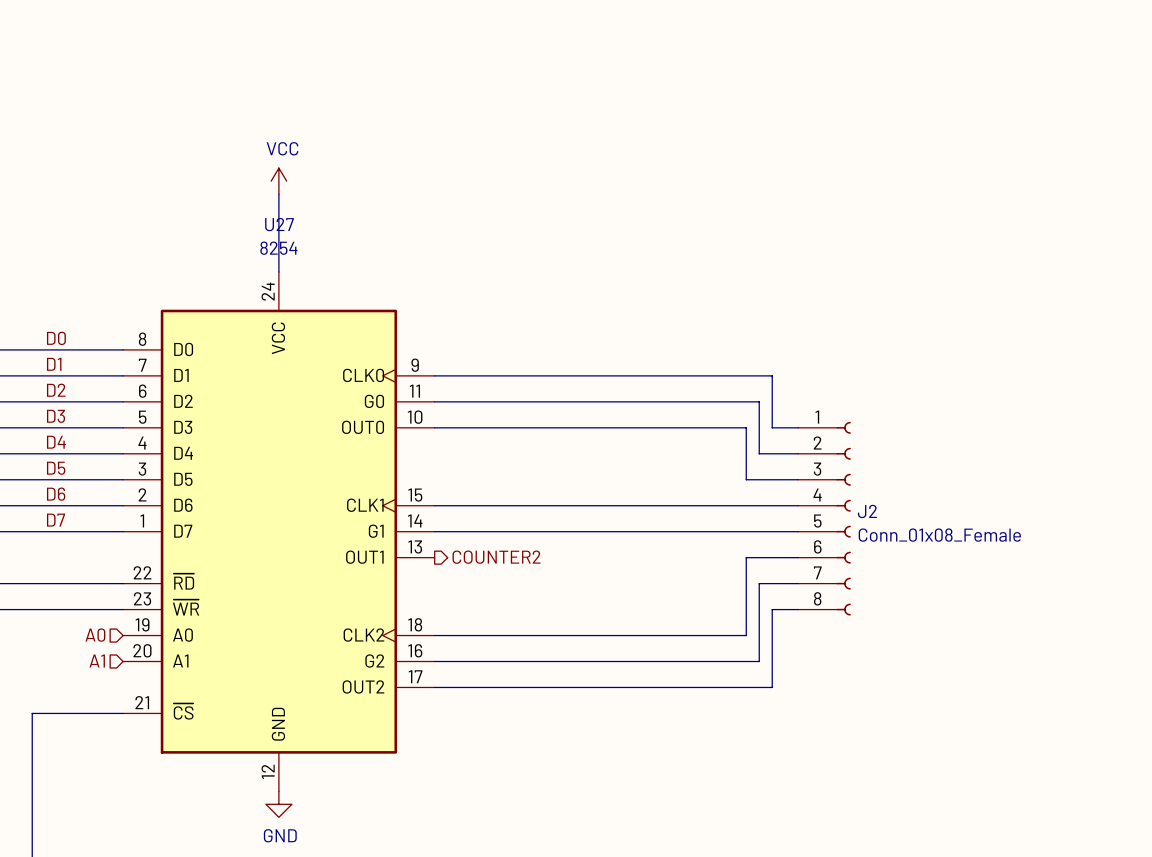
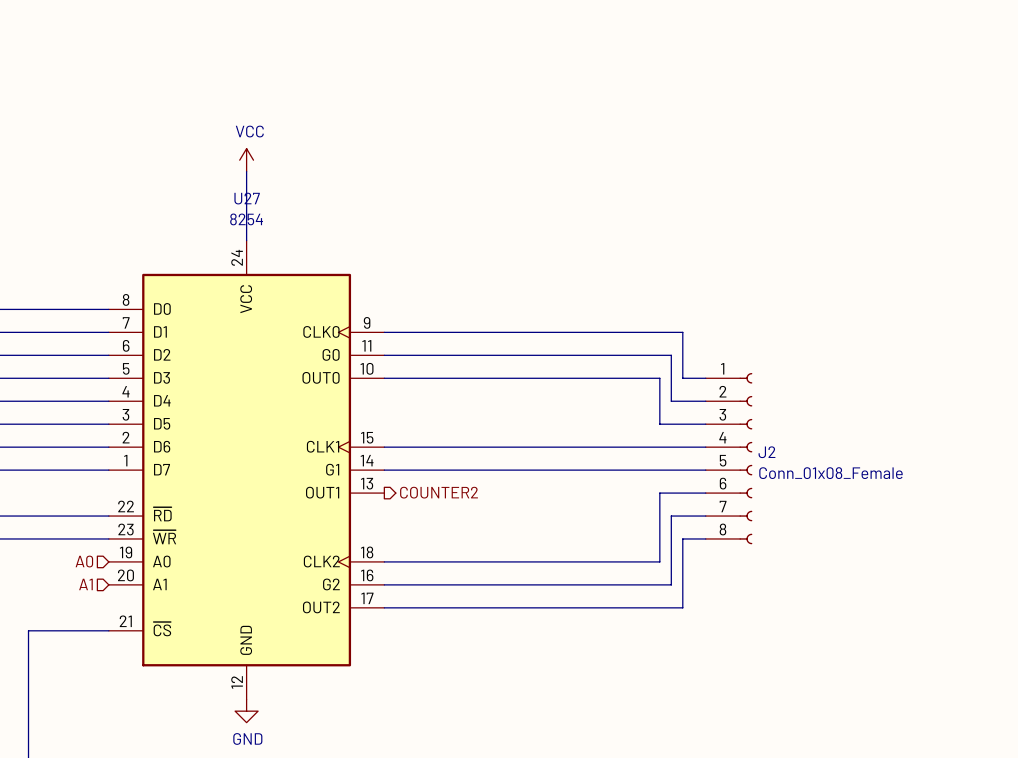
label: D0 (56, 338) -> none
label: D1 (54, 364) -> none
label: D2 (56, 390) -> none
label: D3 (56, 416) -> none
label: D4 (56, 442) -> none
label: D5 (56, 468) -> none
label: D6 (56, 494) -> none
label: D7 (56, 520) -> none

